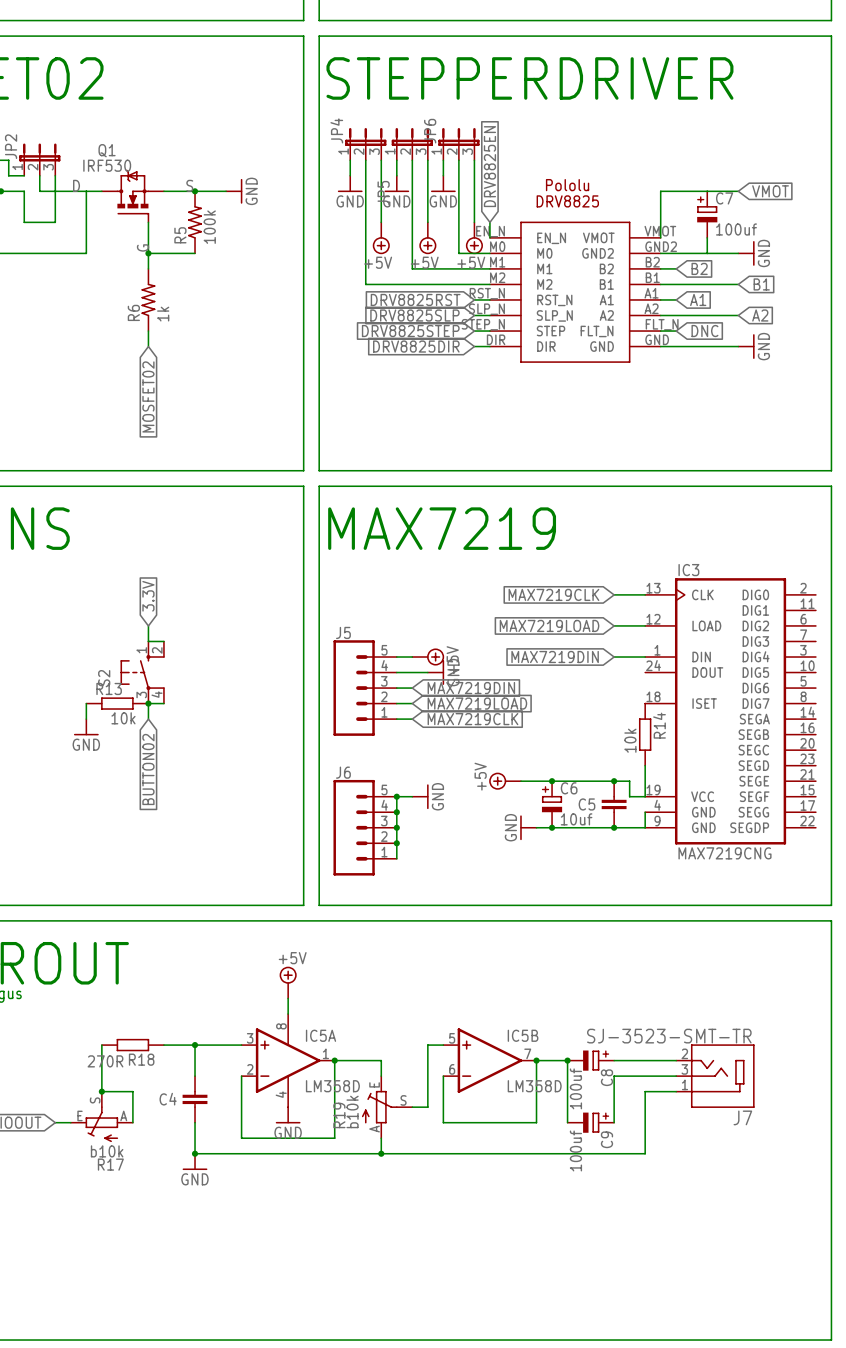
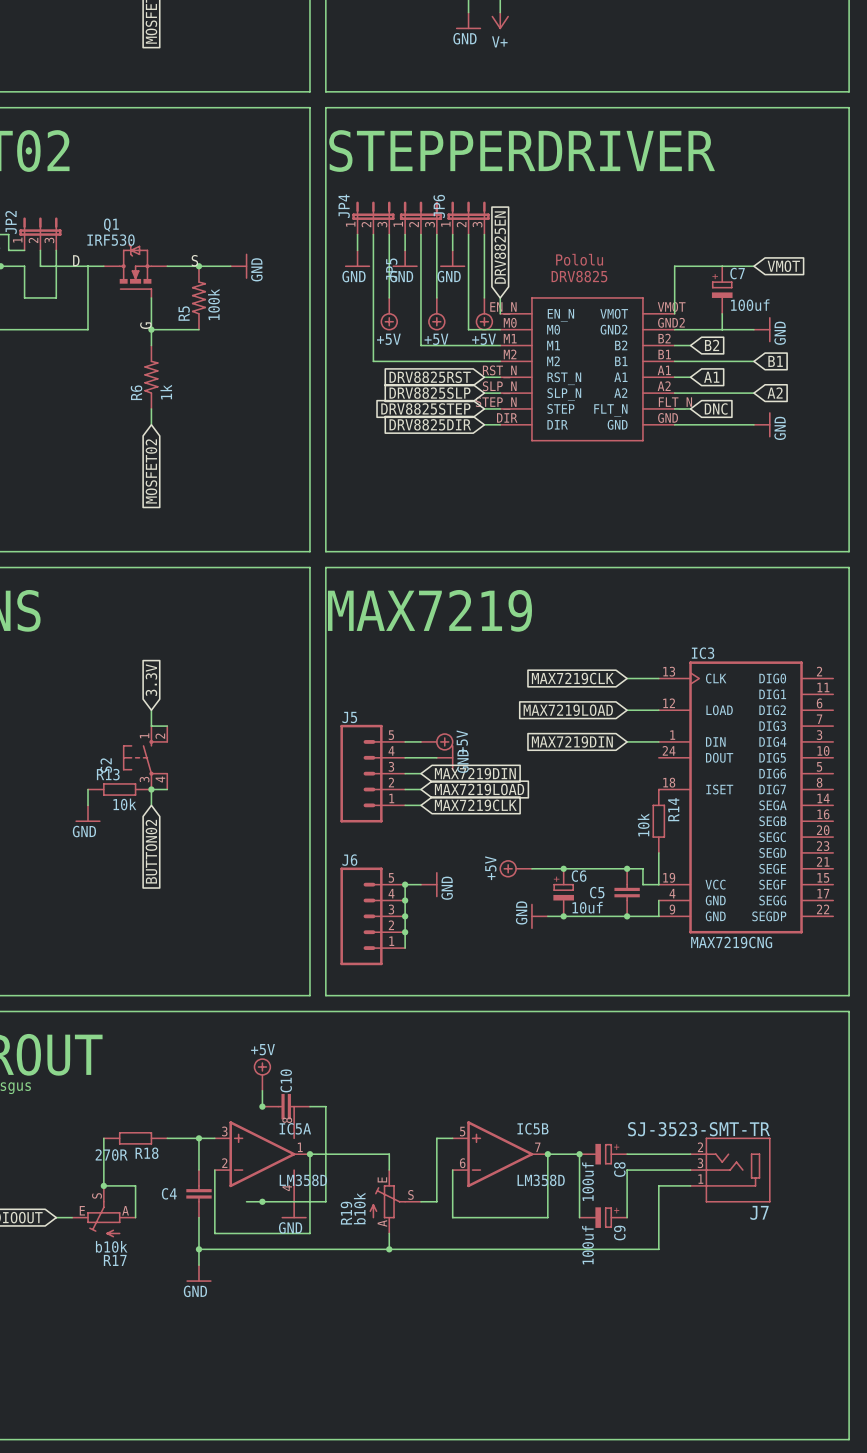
power symbol position: +5V (288, 982) -> +5V (262, 1074)
wire: (288, 998) (288, 1014) -> (262, 1090) (262, 1106)
junction: none -> (262, 1106)
C10: none -> (286, 1106)
wire: none -> (309, 1106) (325, 1106) (325, 1201) (246, 1201)
IC5A position: (288, 1060) -> (262, 1154)
wire: (334, 1060) (334, 1138) (303, 1138) -> (341, 1154) (309, 1154) (309, 1233)
junction position: (334, 1060) -> (309, 1154)
wire: (241, 1076) (241, 1138) -> (214, 1170) (214, 1233) (246, 1233)
junction: none -> (262, 1201)
power symbol position: GND (195, 1161) -> GND (198, 1273)

